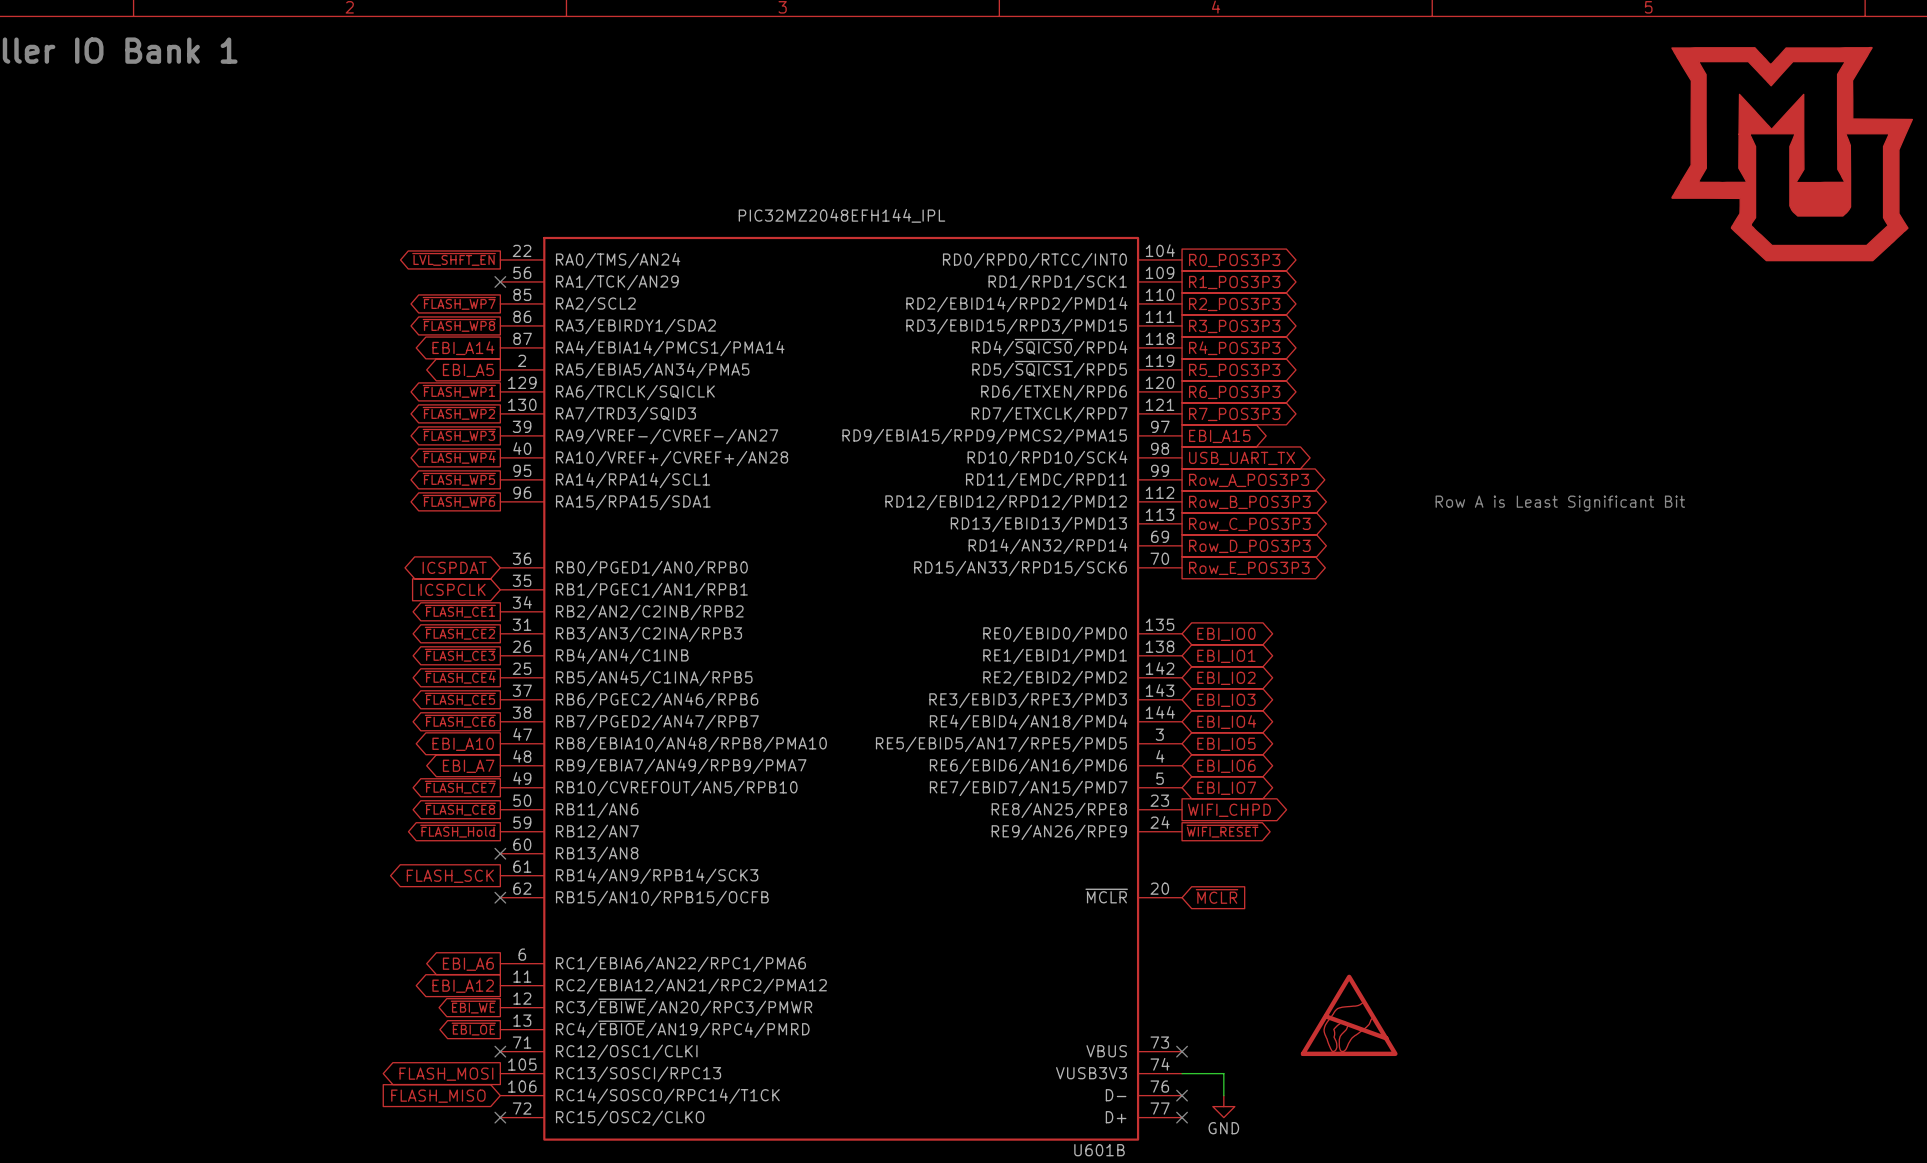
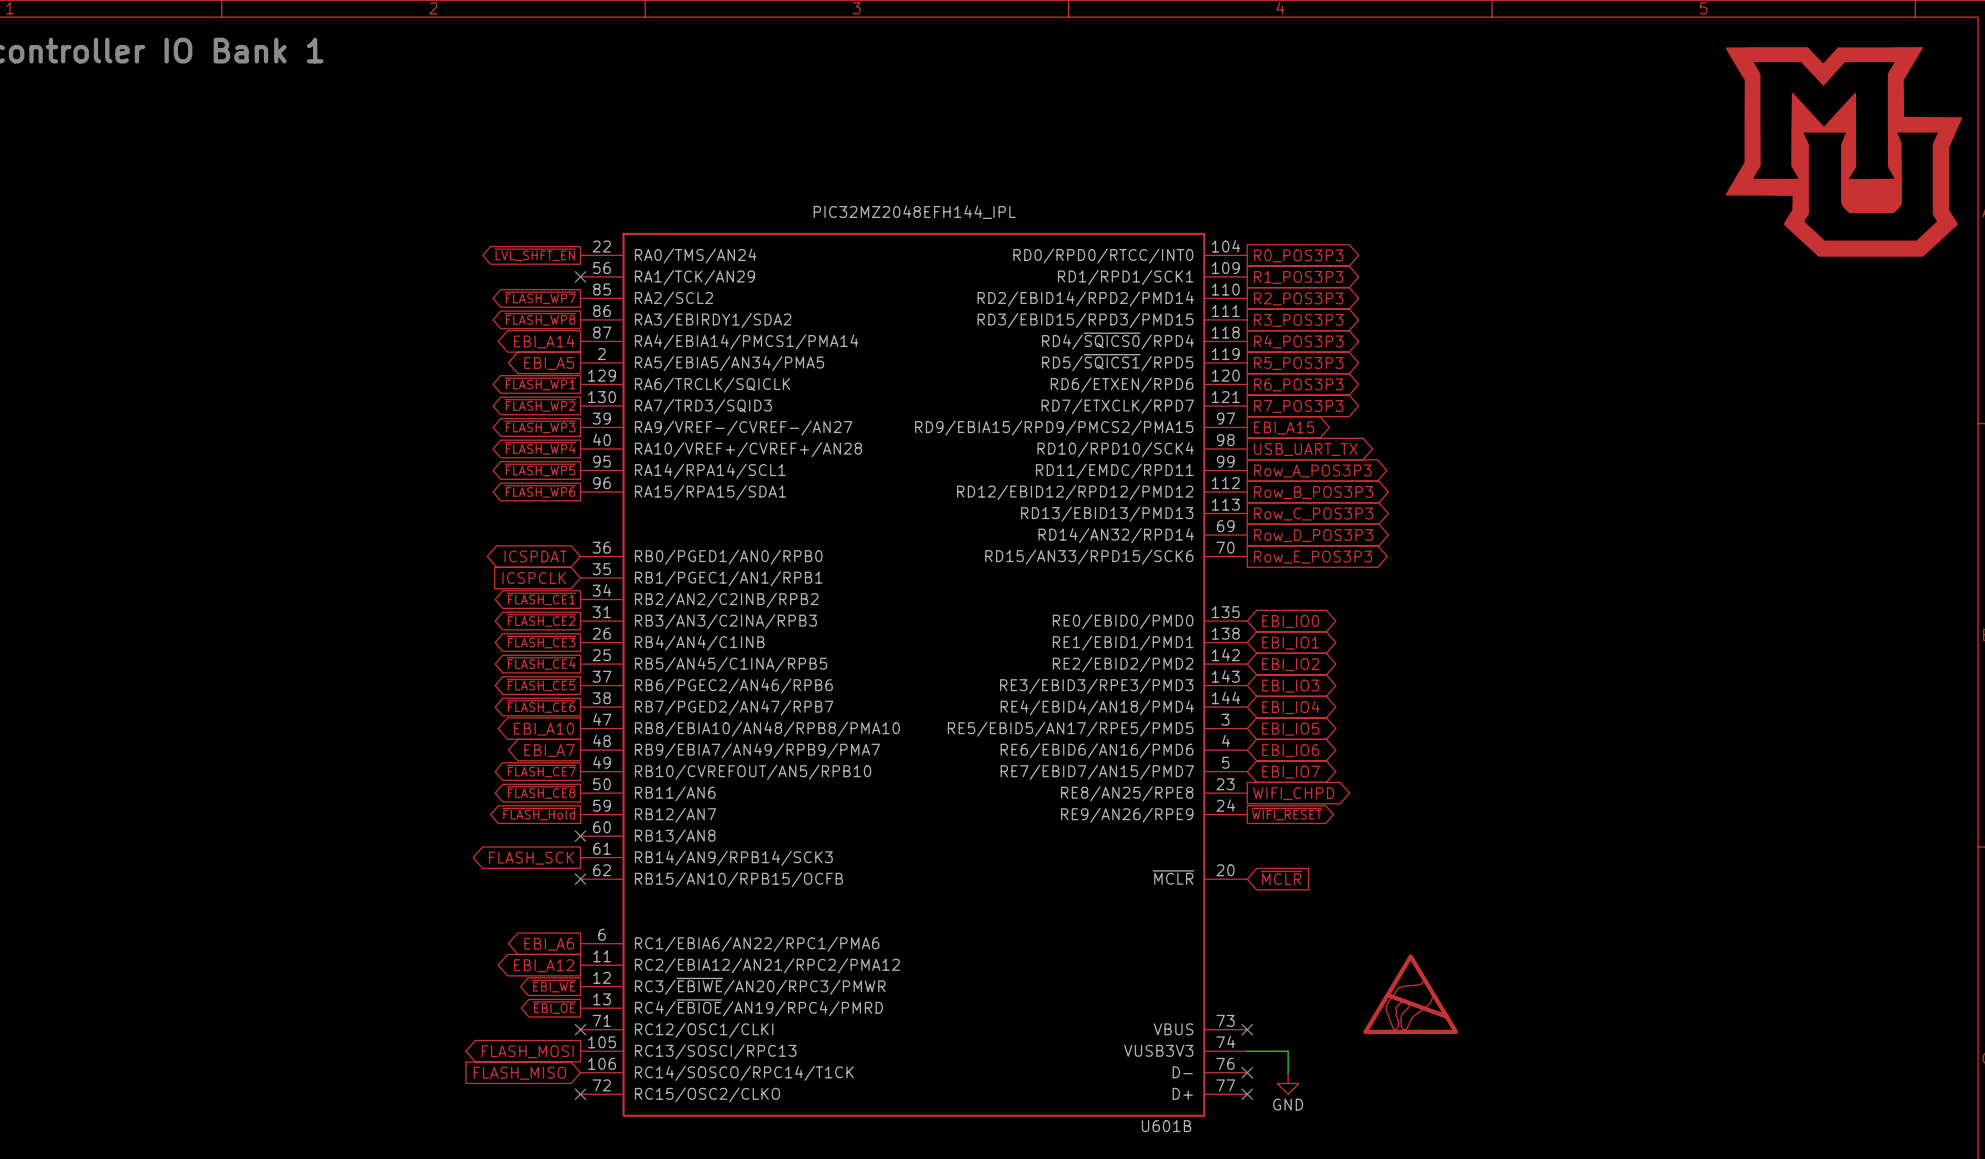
text: Row A is Least Significant Bit (1560, 503) -> none

